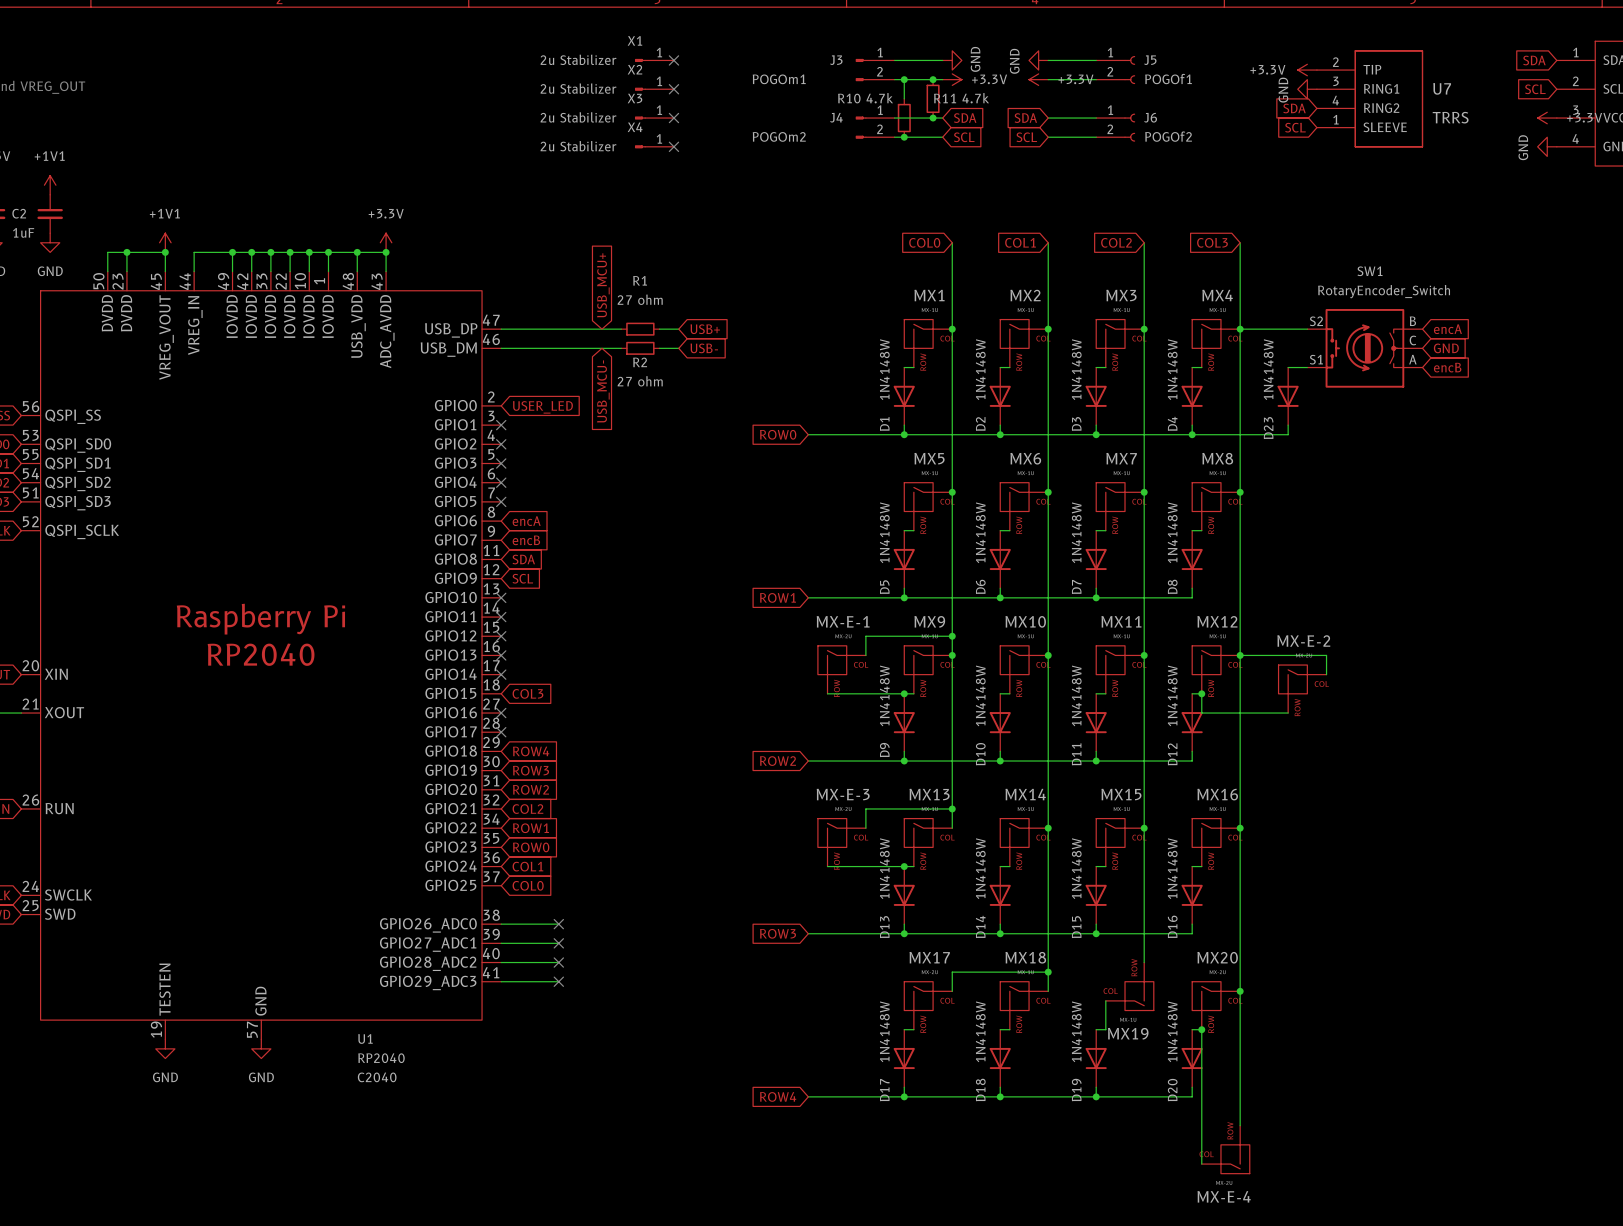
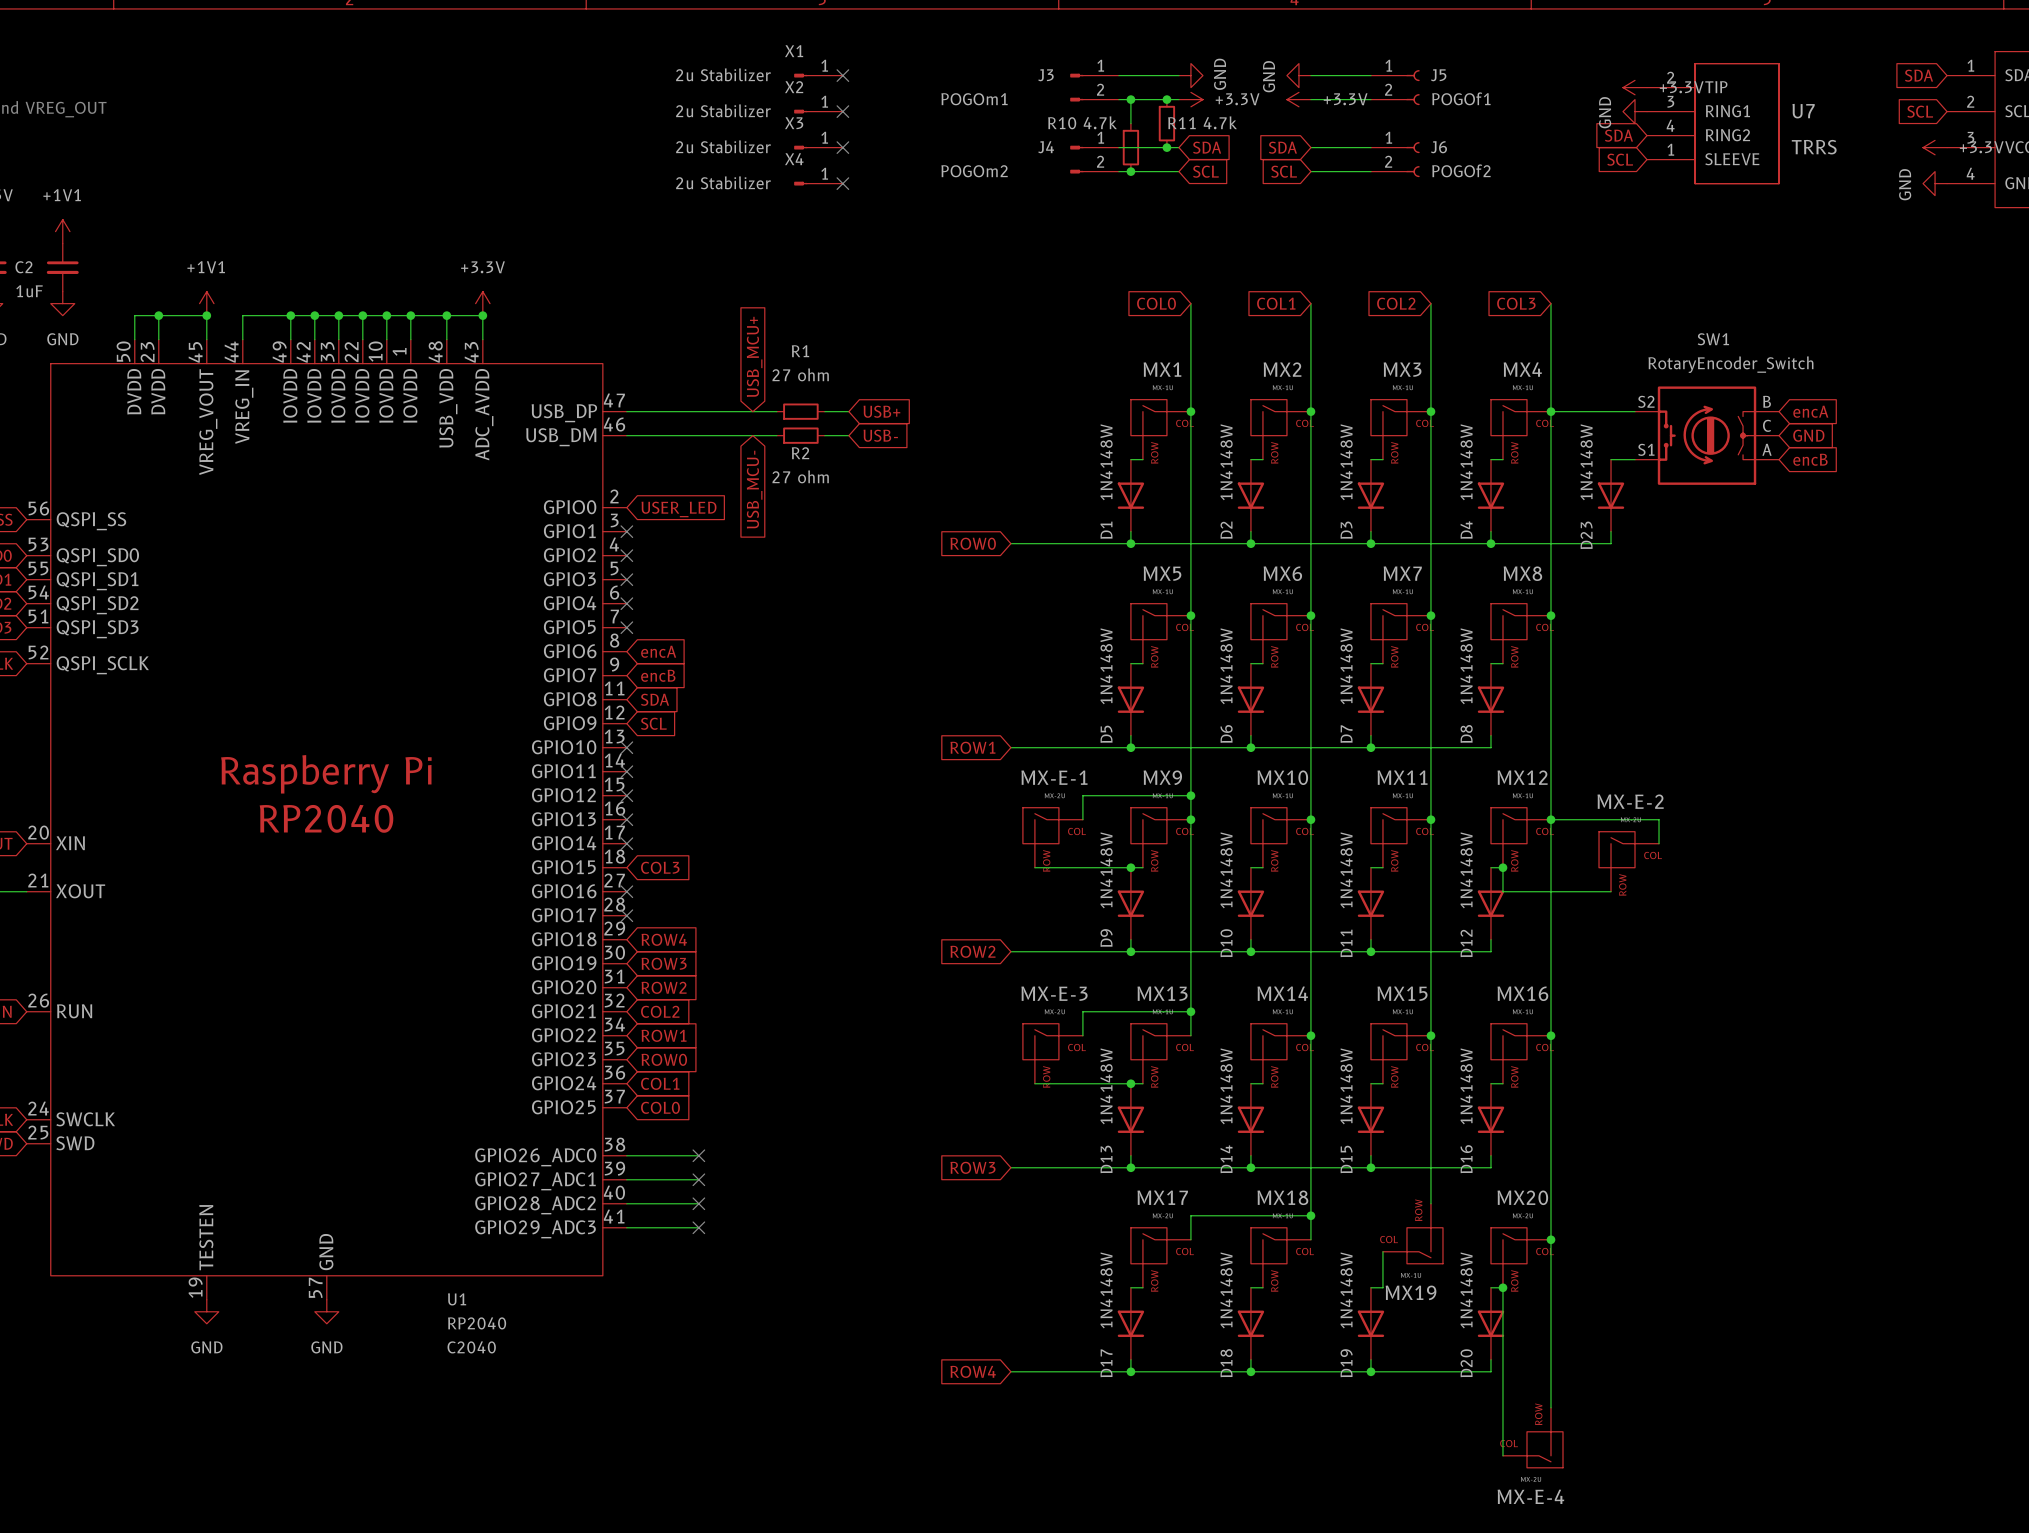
power symbol text position: +3.3V (1267, 69) -> +3.3V (1681, 87)

